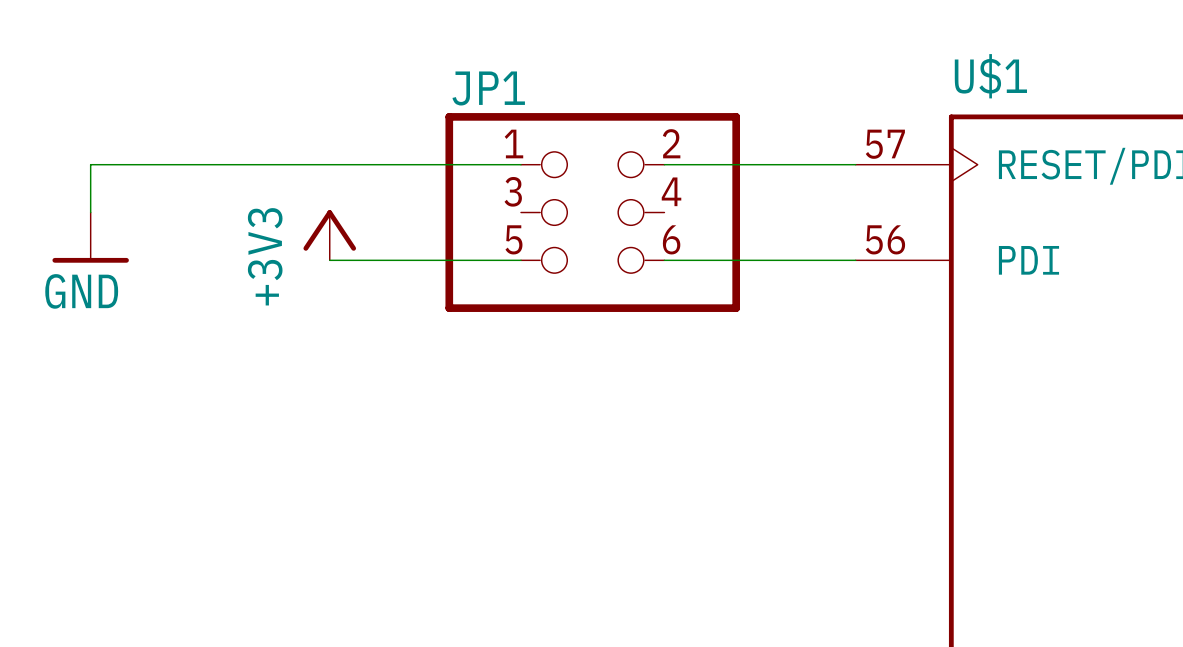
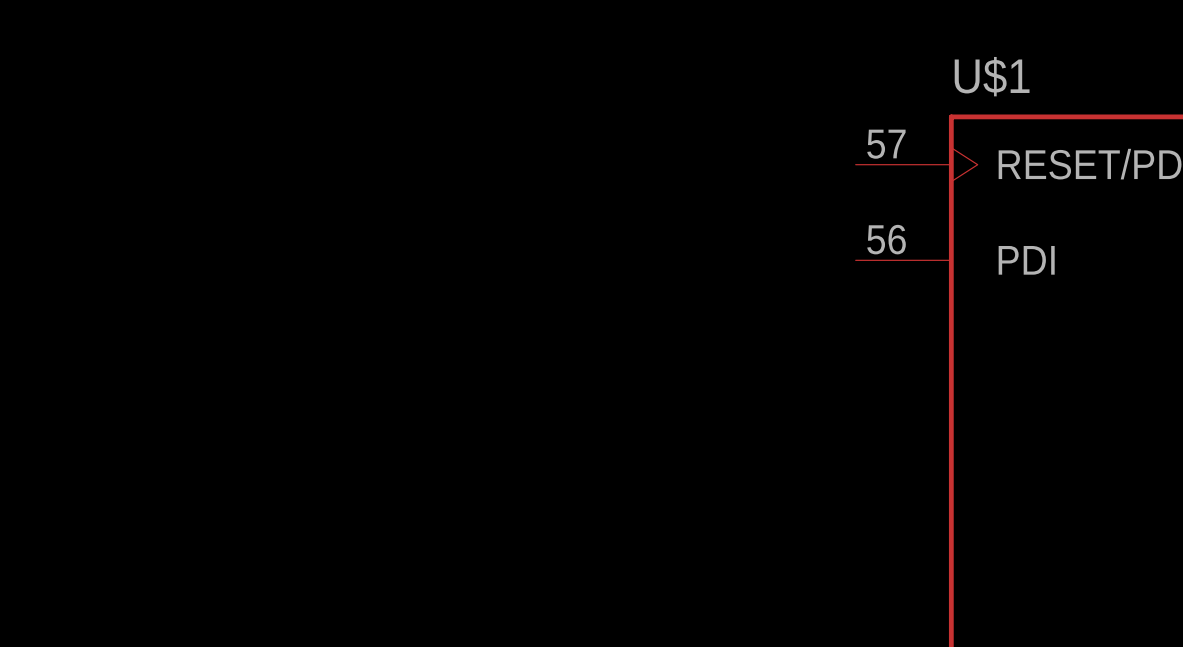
wire: (521, 164) (90, 164) (90, 212) -> none
wire: (664, 164) (855, 164) -> none
JP1: (592, 212) -> none
power symbol: +3V3 (329, 235) -> none
power symbol: GND (90, 237) -> none
wire: (329, 260) (521, 260) -> none
wire: (664, 260) (855, 260) -> none

